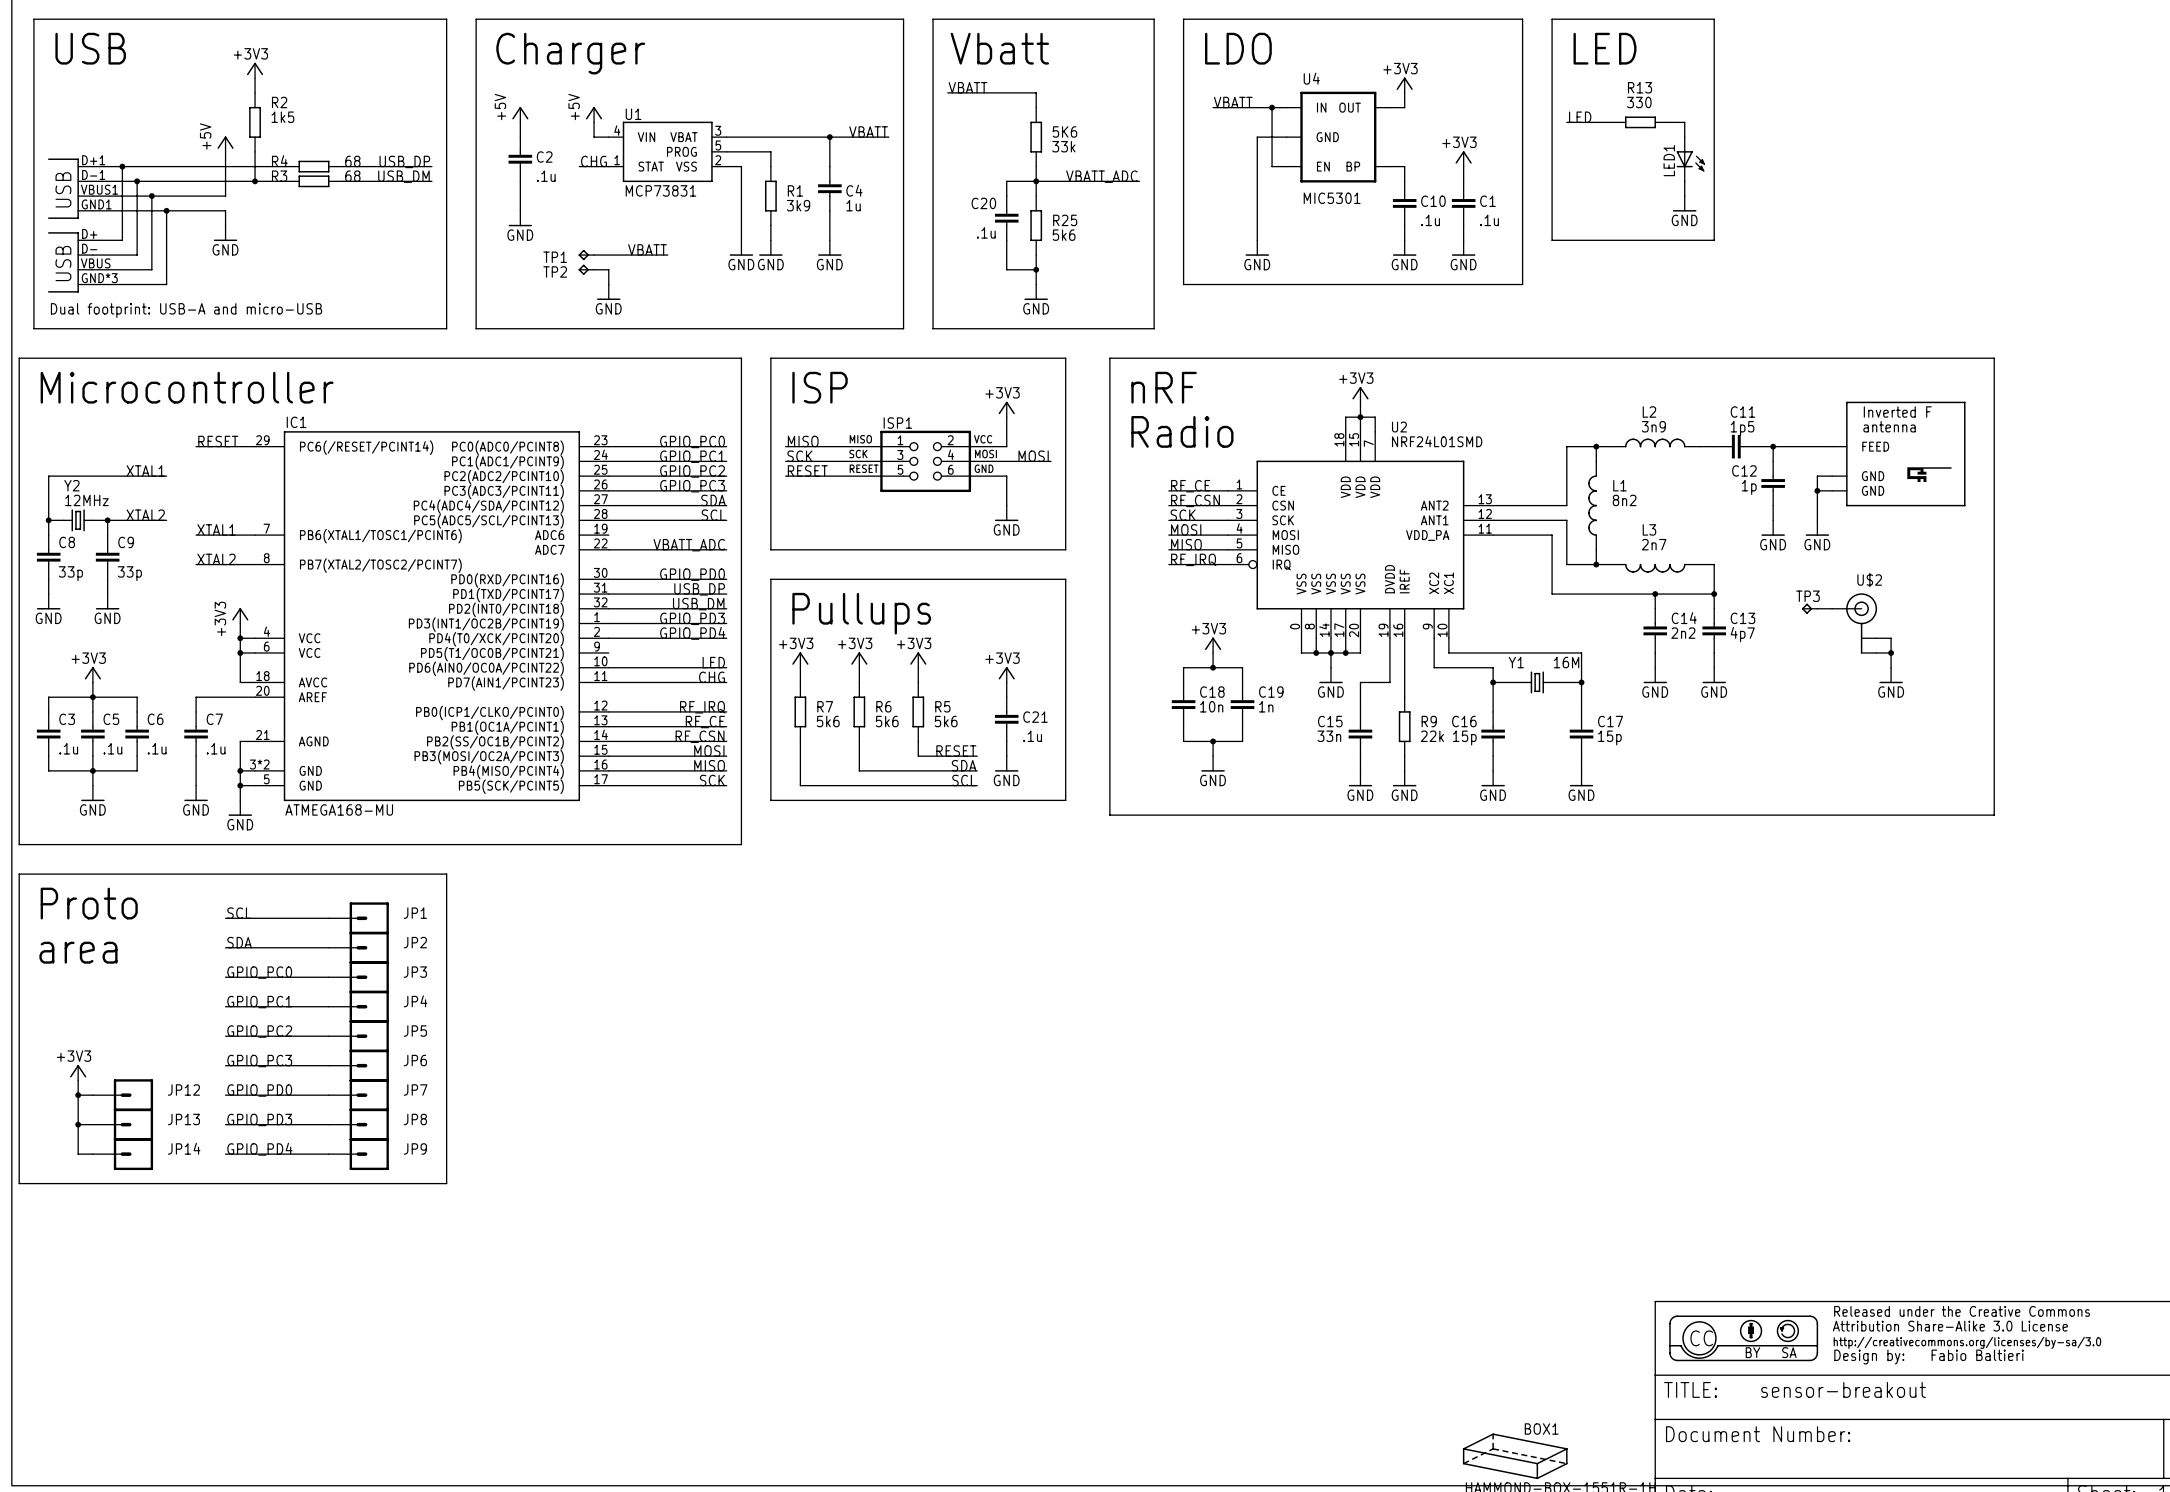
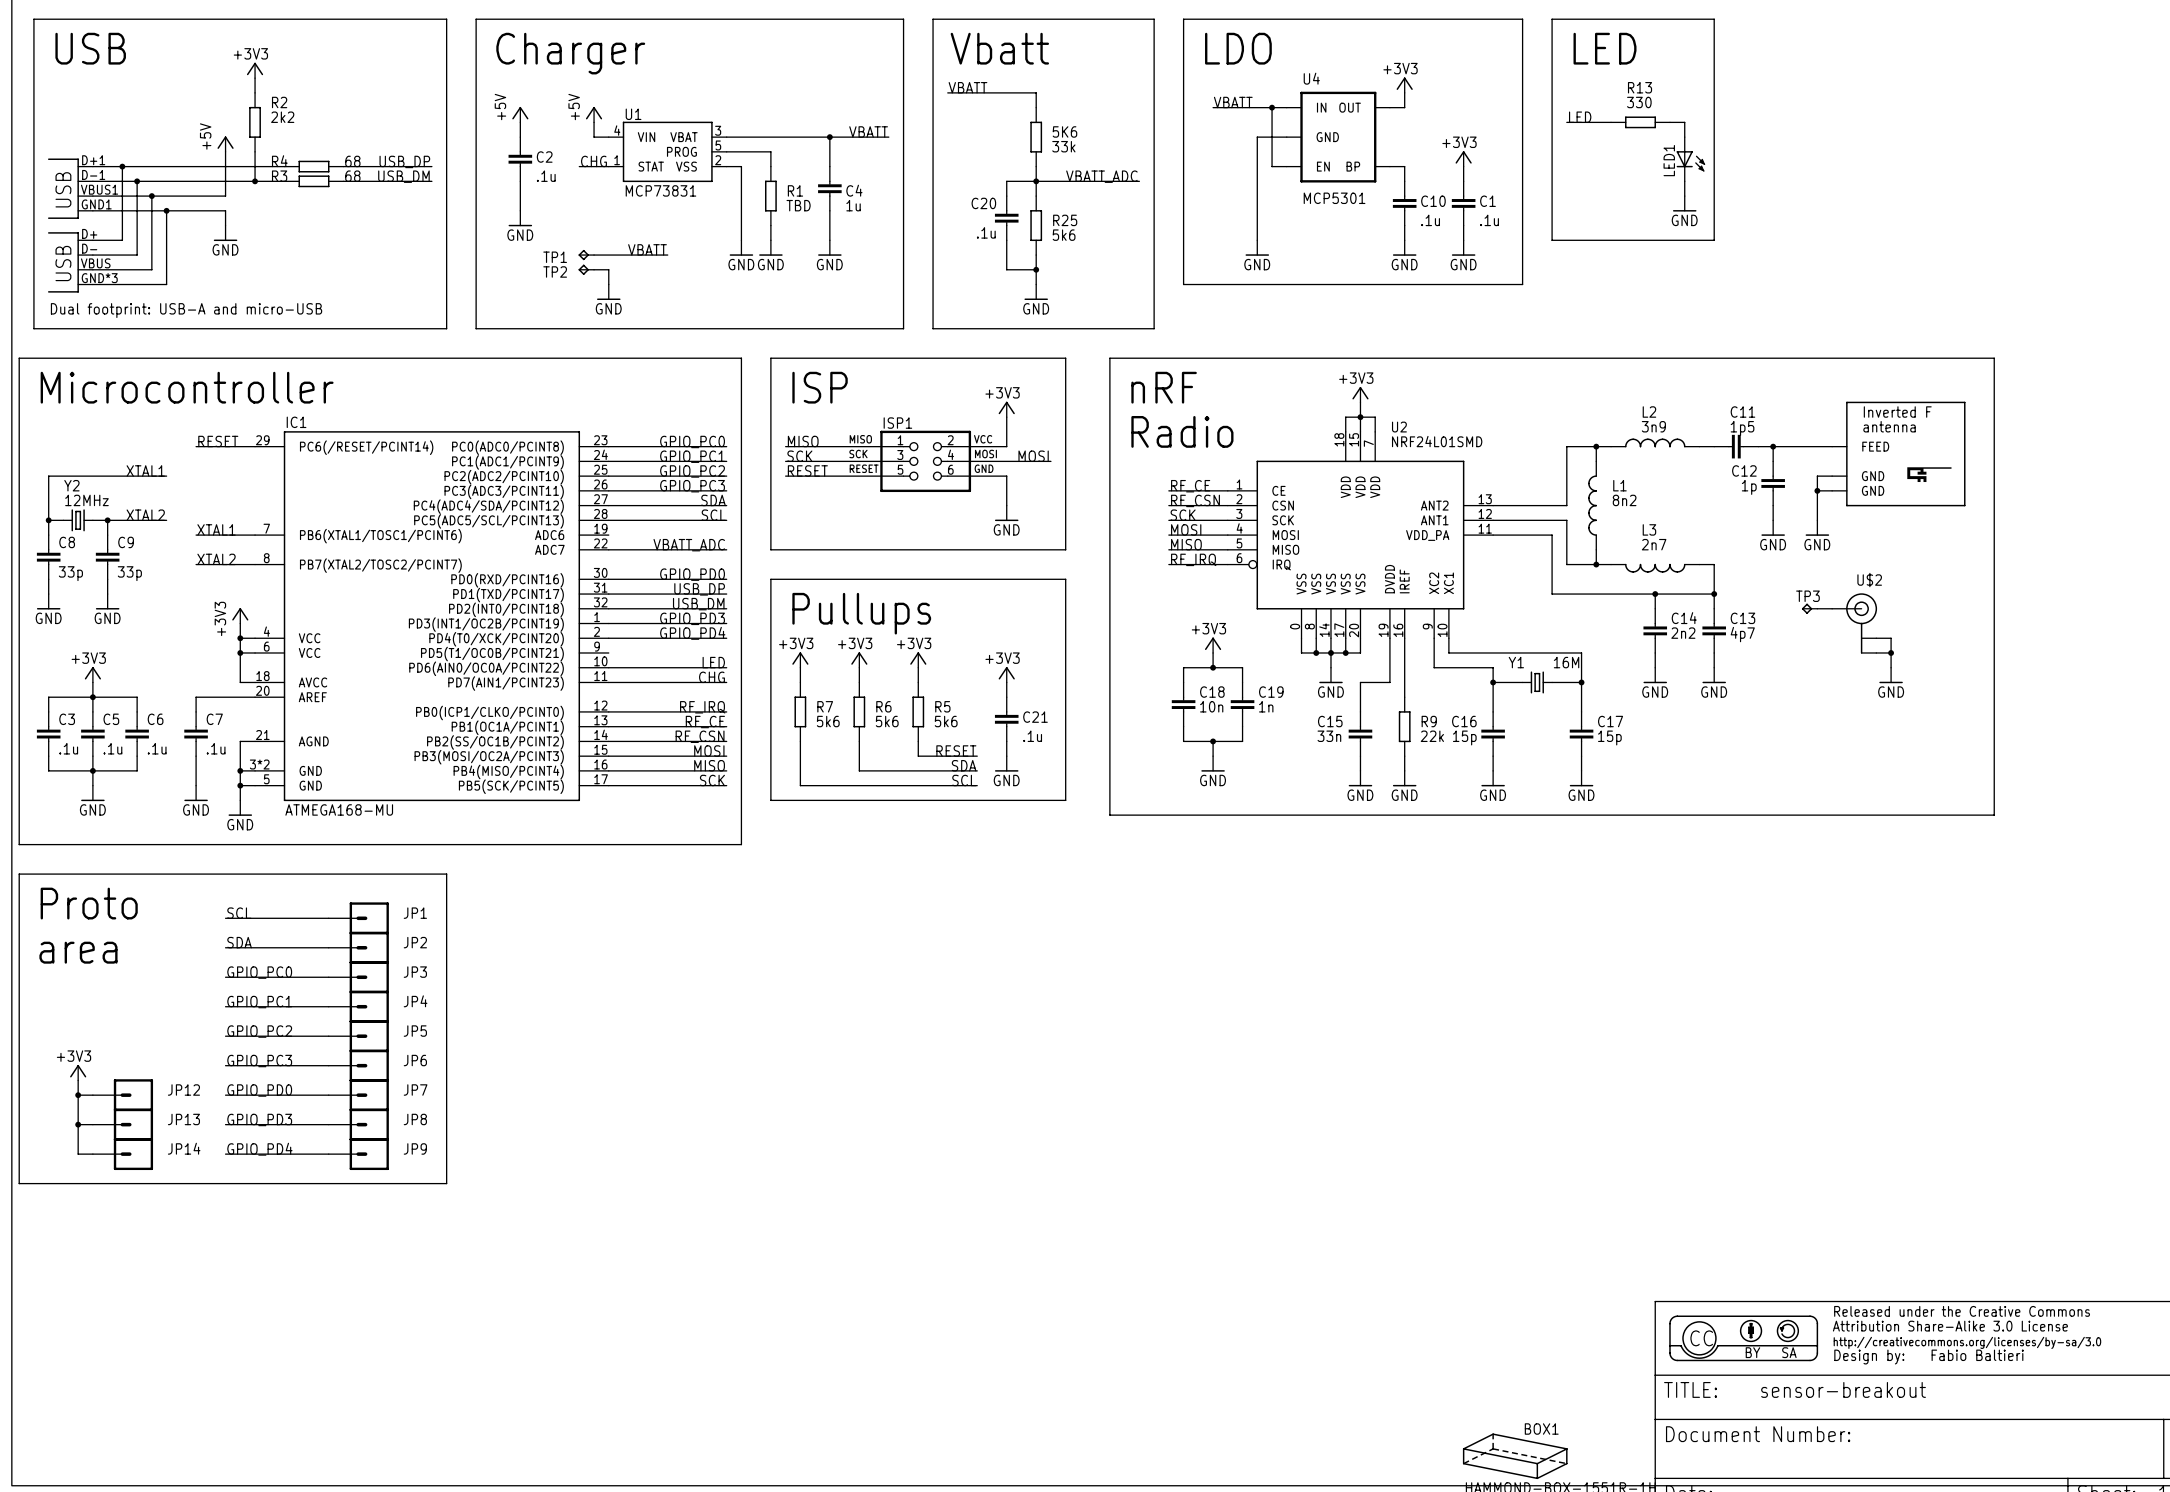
R2 value: 1k5 (282, 117) -> 2k2 (282, 117)
U4 value: MIC5301 (1332, 198) -> MCP5301 (1334, 198)
R1 value: 3k9 (798, 205) -> TBD (798, 205)

